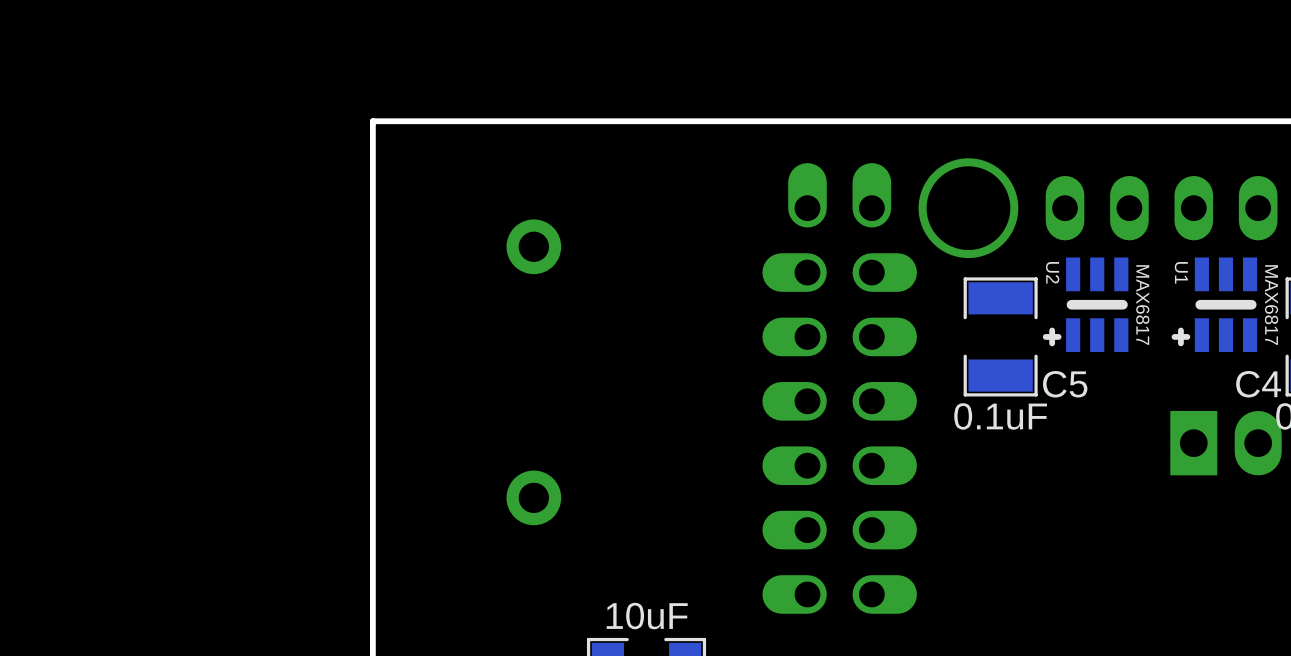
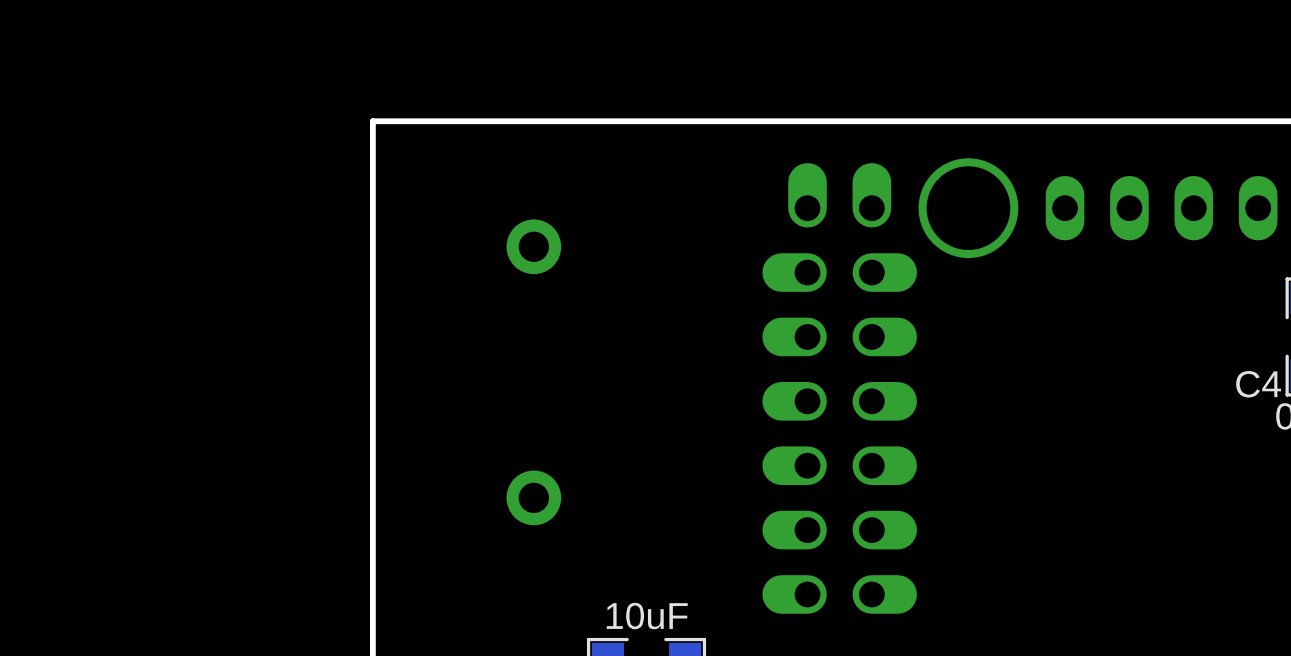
U2: MAX6817 (1085, 304) -> none
U1: MAX6817 (1214, 304) -> none
C5: 0.1uF (1000, 336) -> none
part: (1225, 443) -> none

